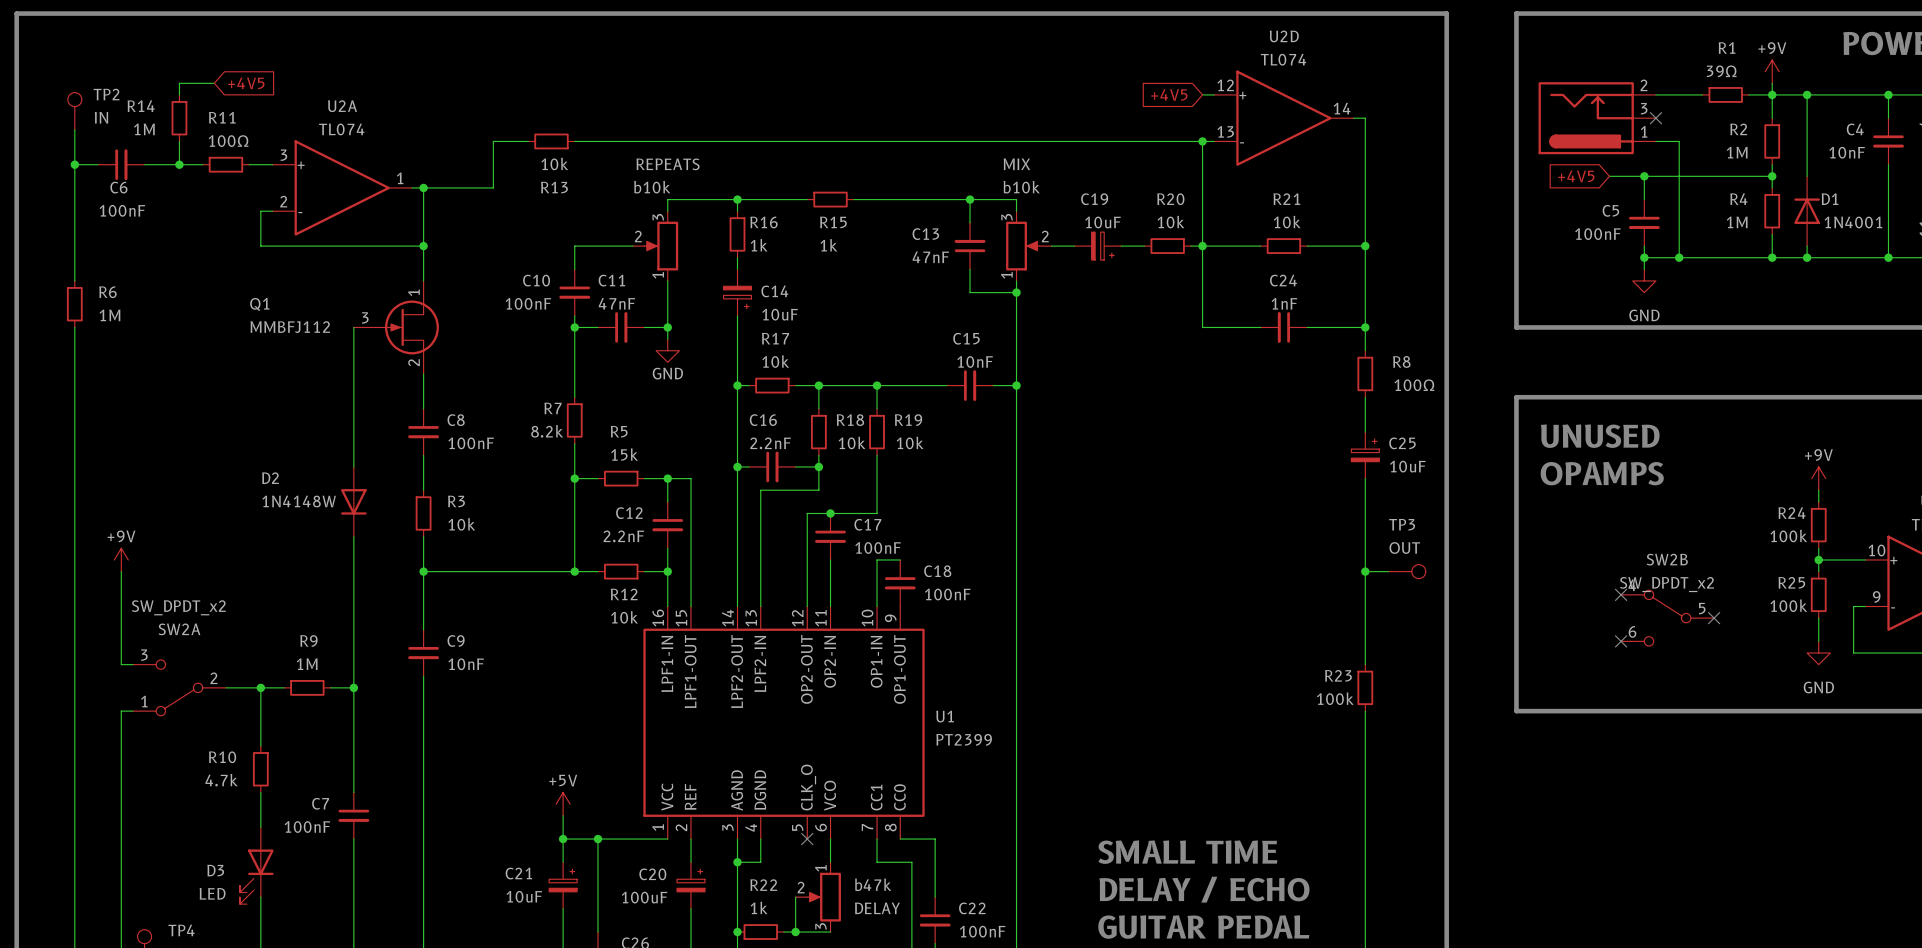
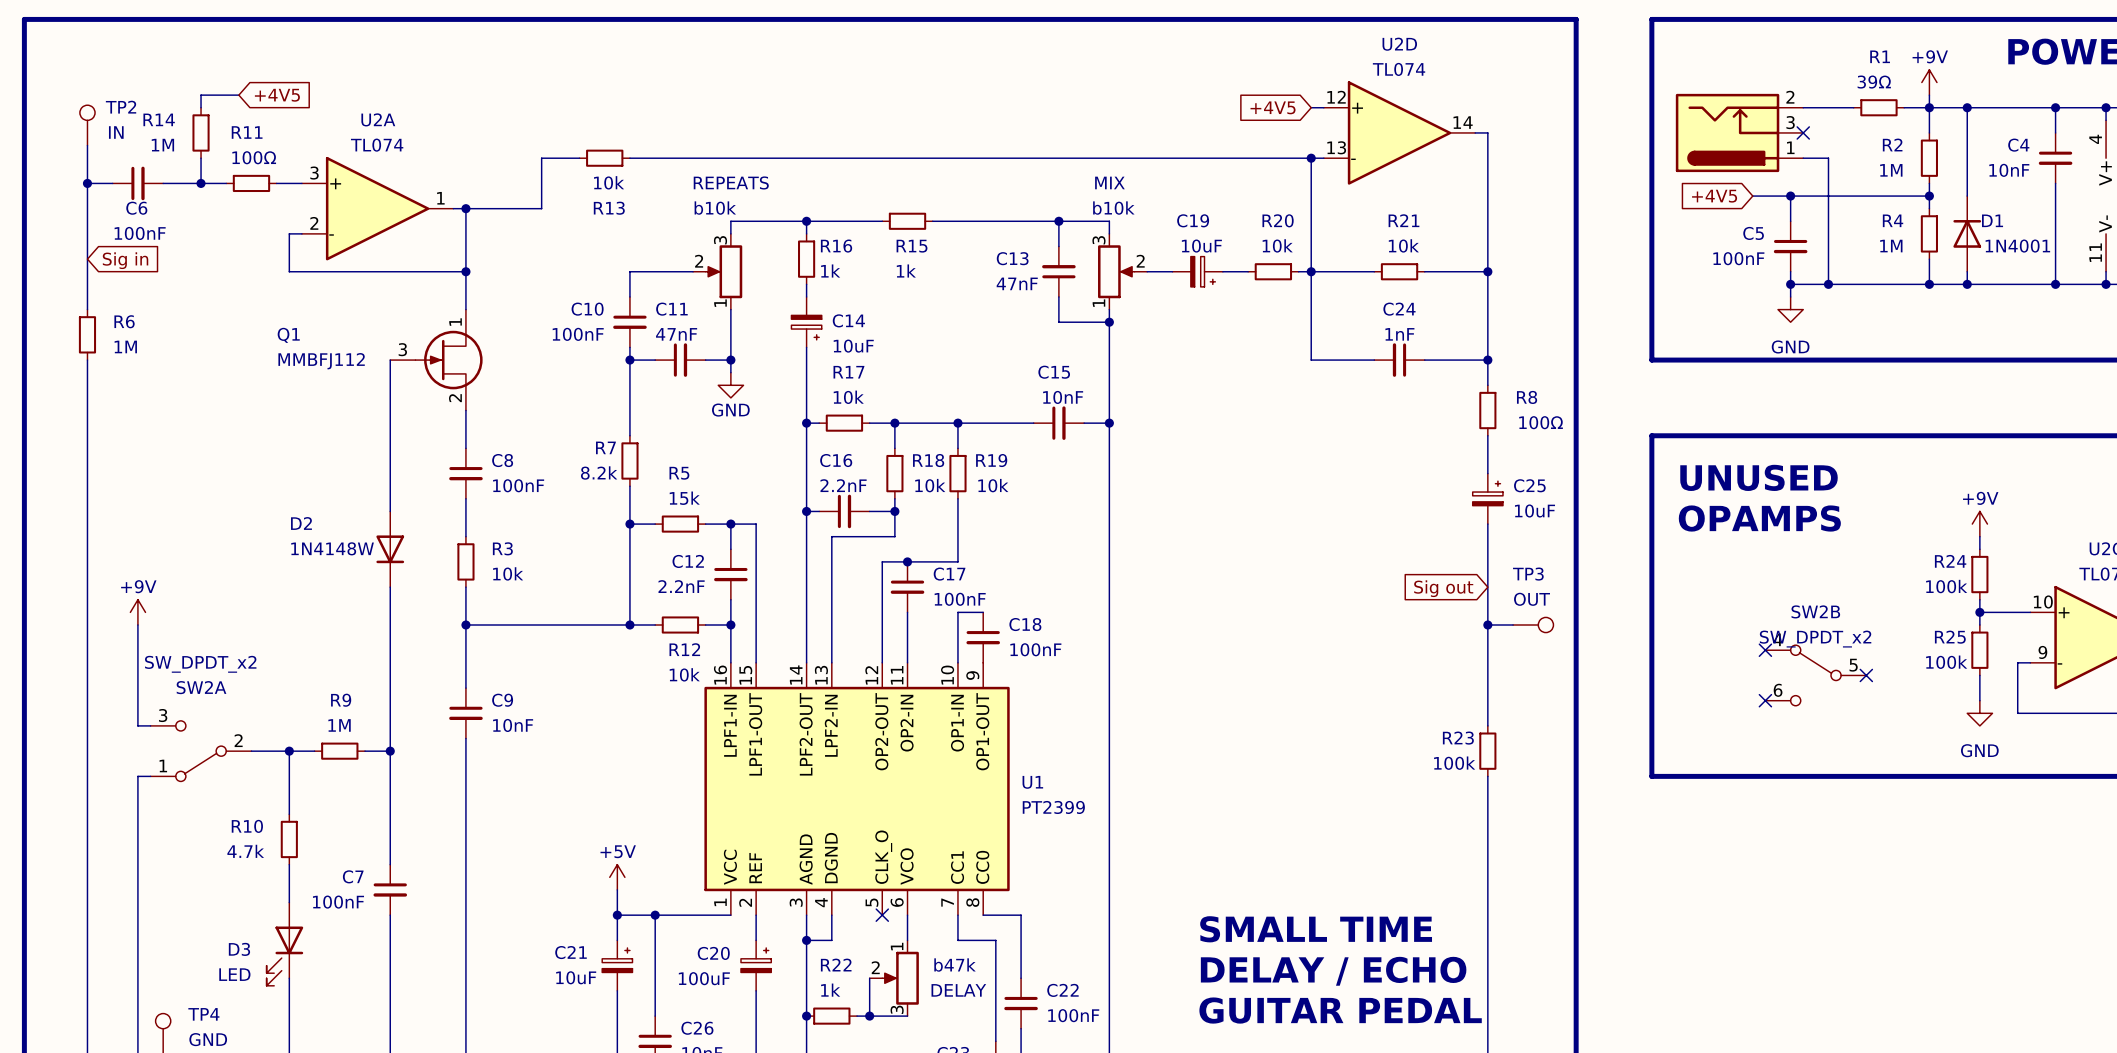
global label: none -> Sig in (125, 260)
global label: none -> Sig out (1443, 588)

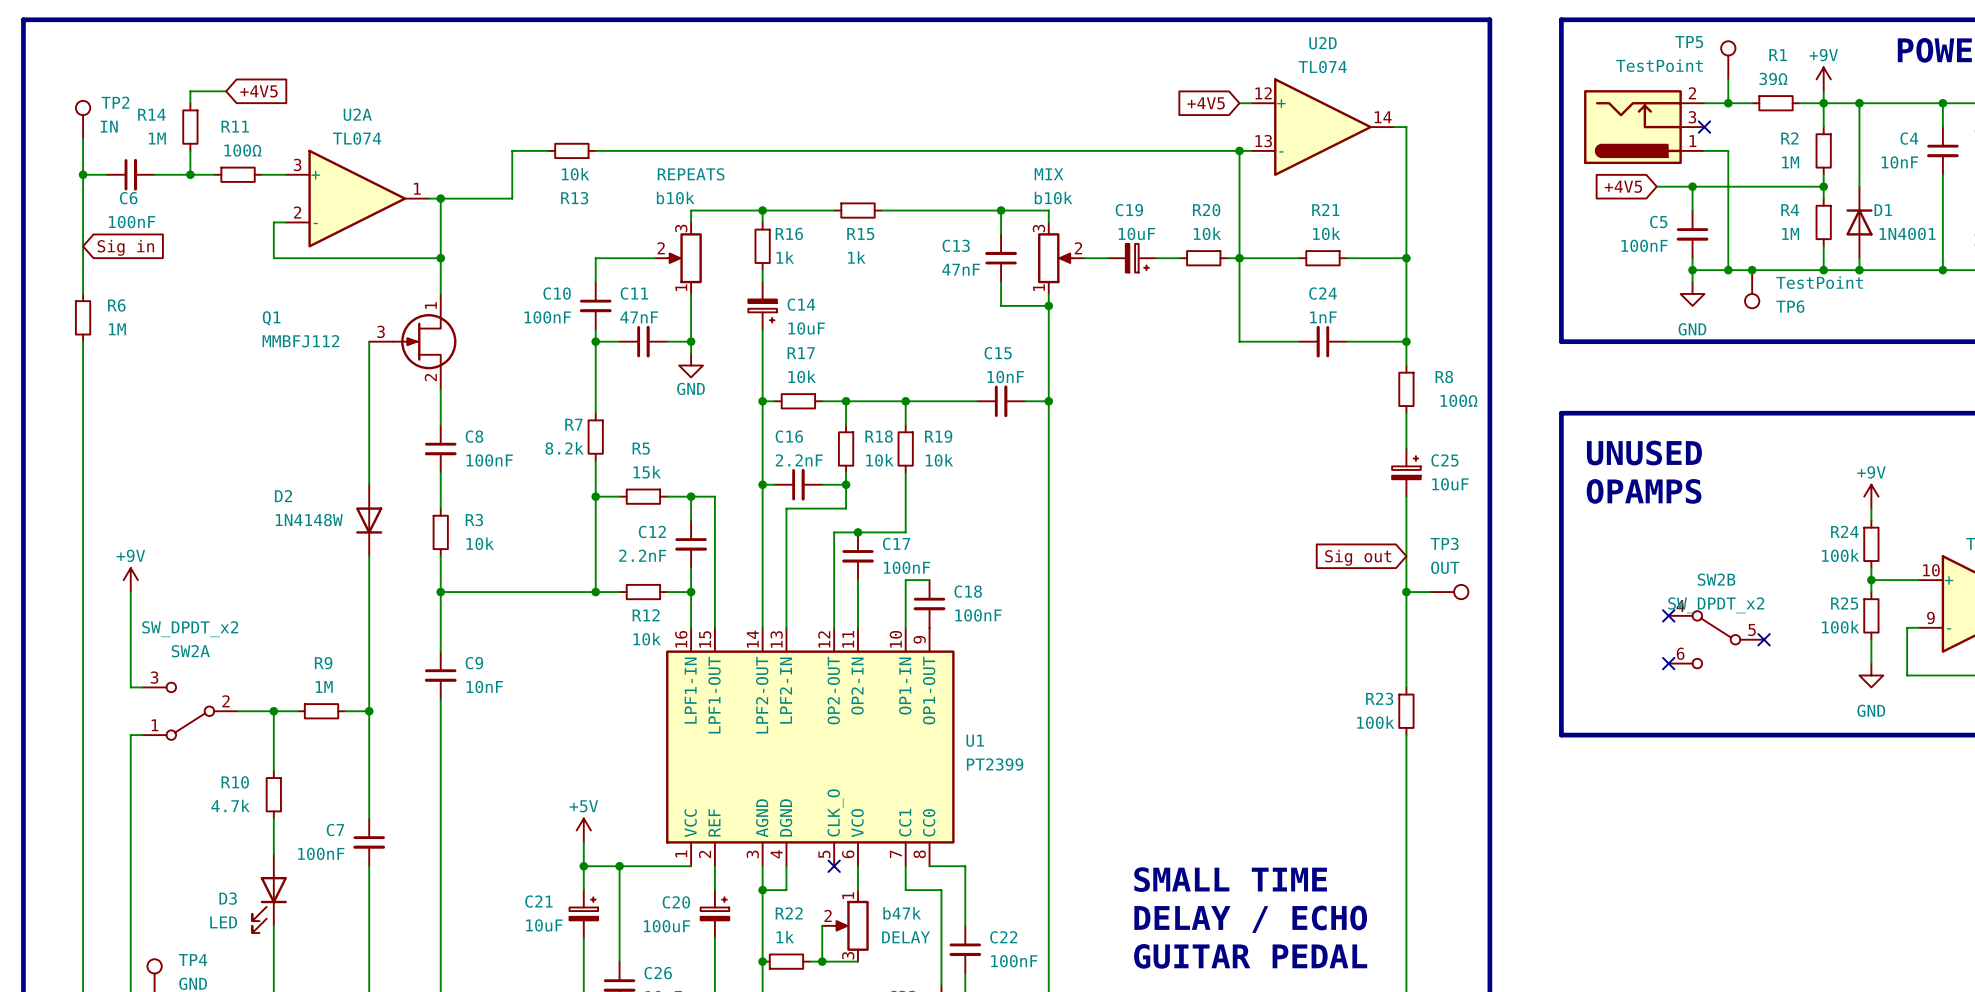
TP5: none -> TestPoint (1728, 60)
wire: none -> (1728, 79) (1728, 103)
junction: none -> (1728, 103)
junction: none -> (1752, 270)
TP6: none -> TestPoint (1752, 289)

